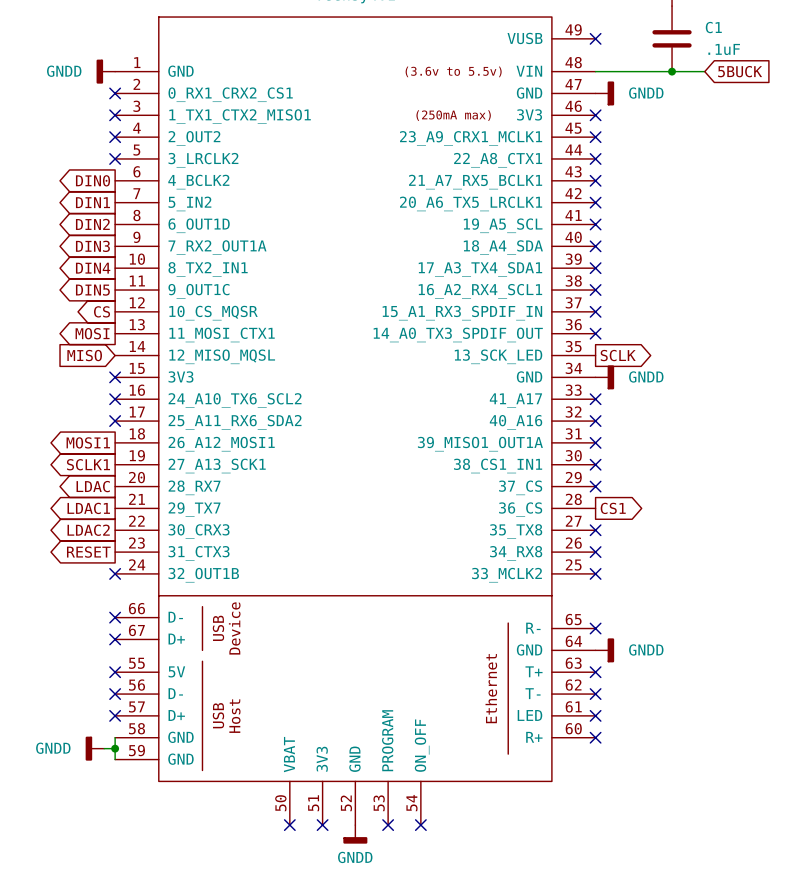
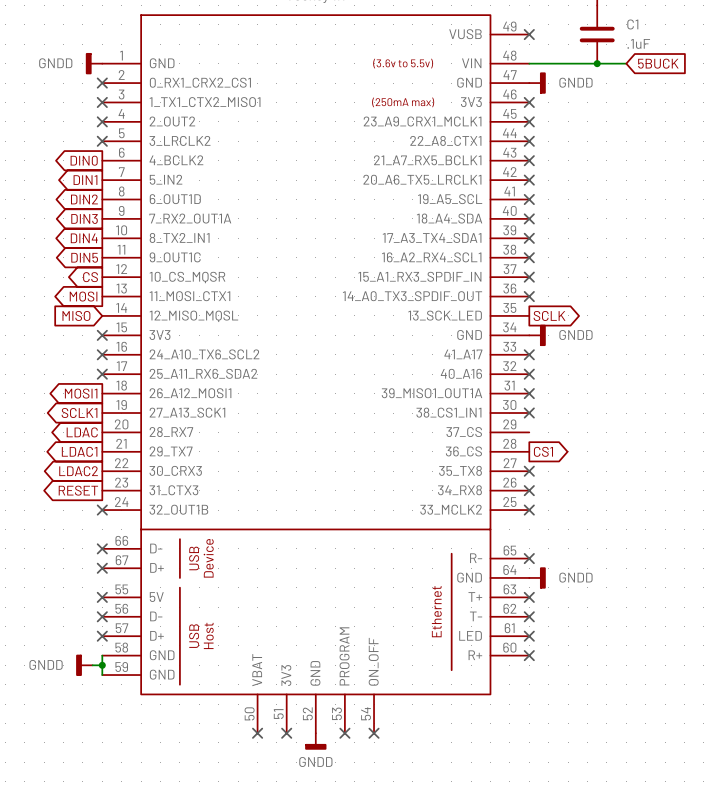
no-connect mark: (595, 486) -> none

